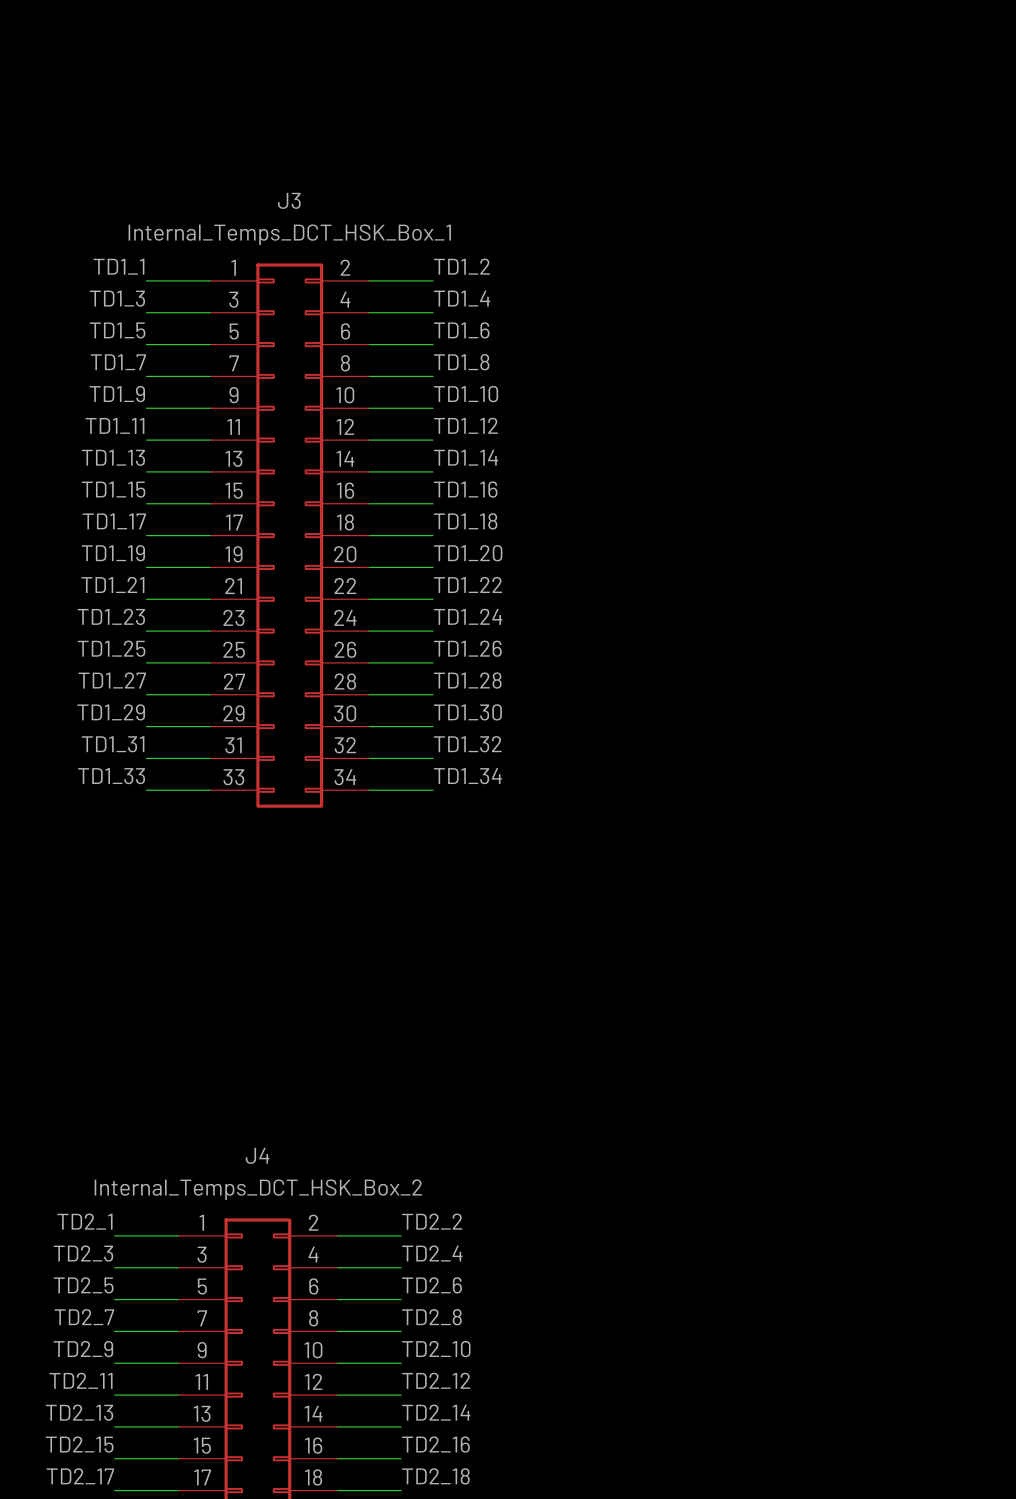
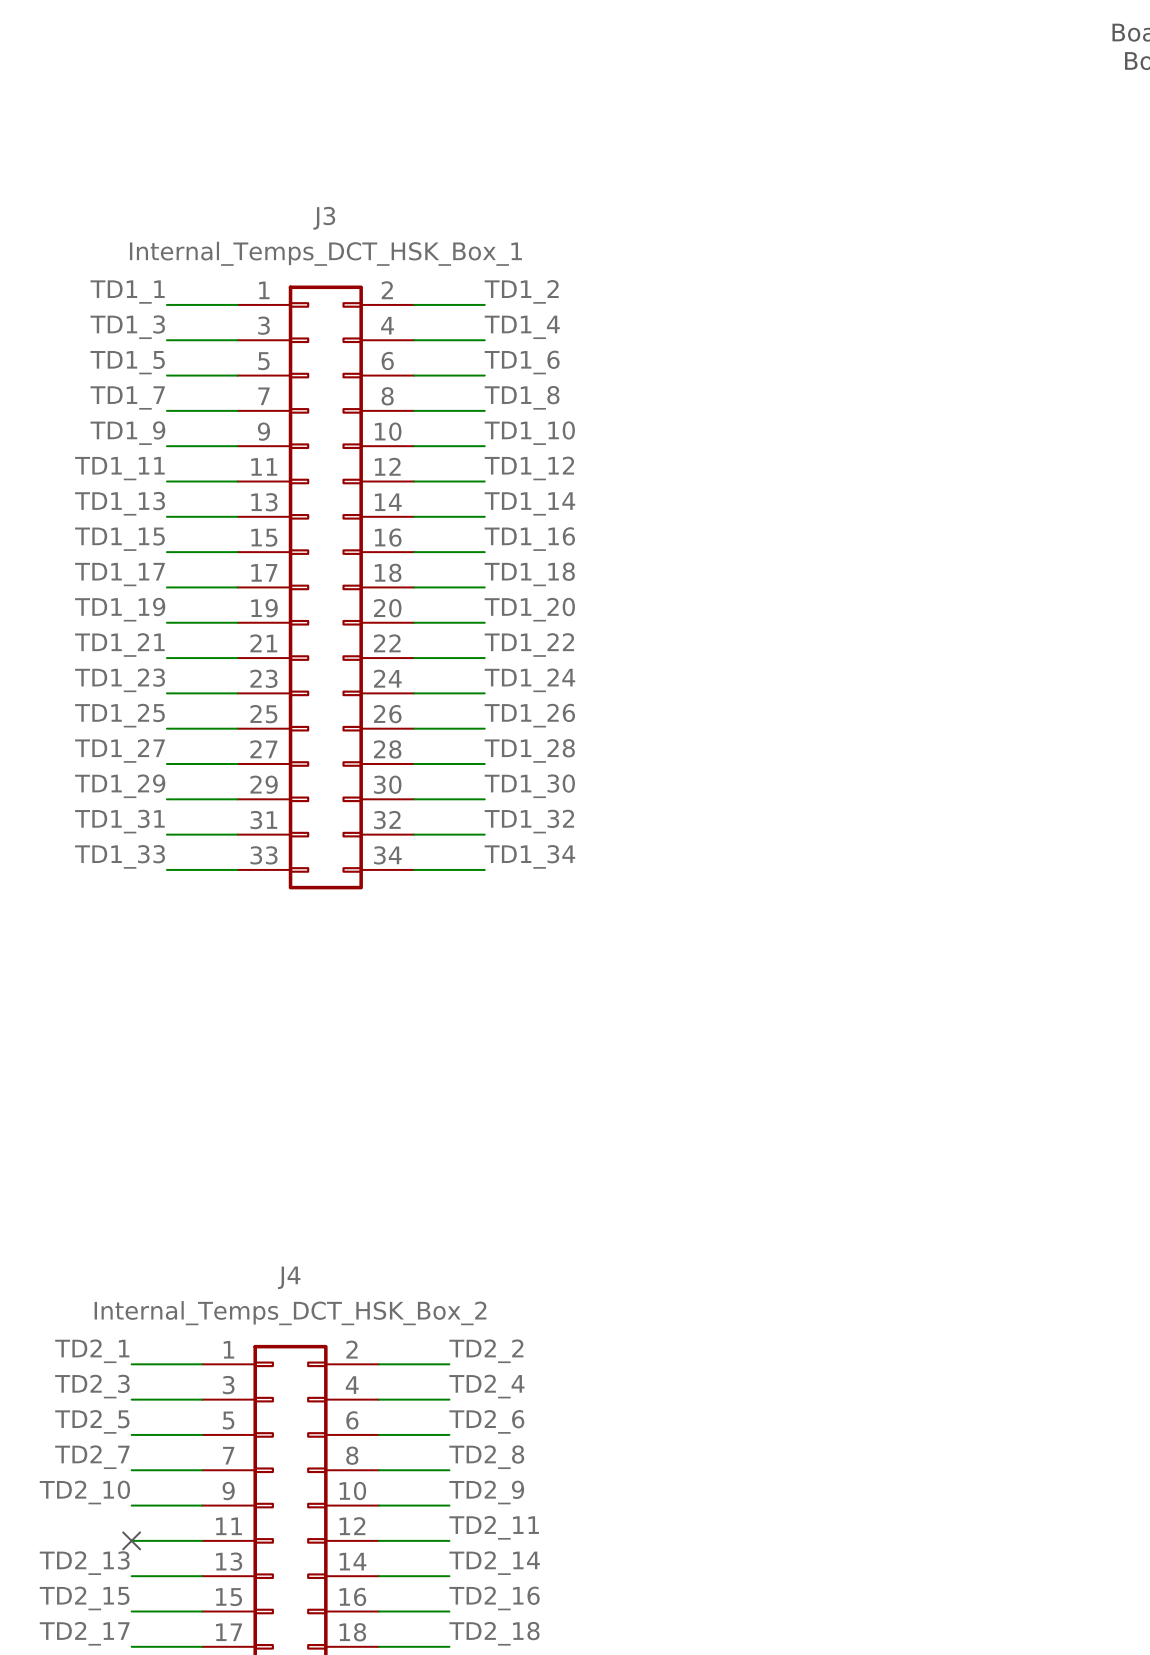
label: TD2_9 (83, 1349) -> TD2_10 (84, 1492)
label: TD2_10 (436, 1349) -> TD2_9 (486, 1492)
label: TD2_11 (81, 1380) -> none
label: TD2_12 (436, 1380) -> TD2_11 (494, 1527)
no-connect mark: none -> (131, 1540)

